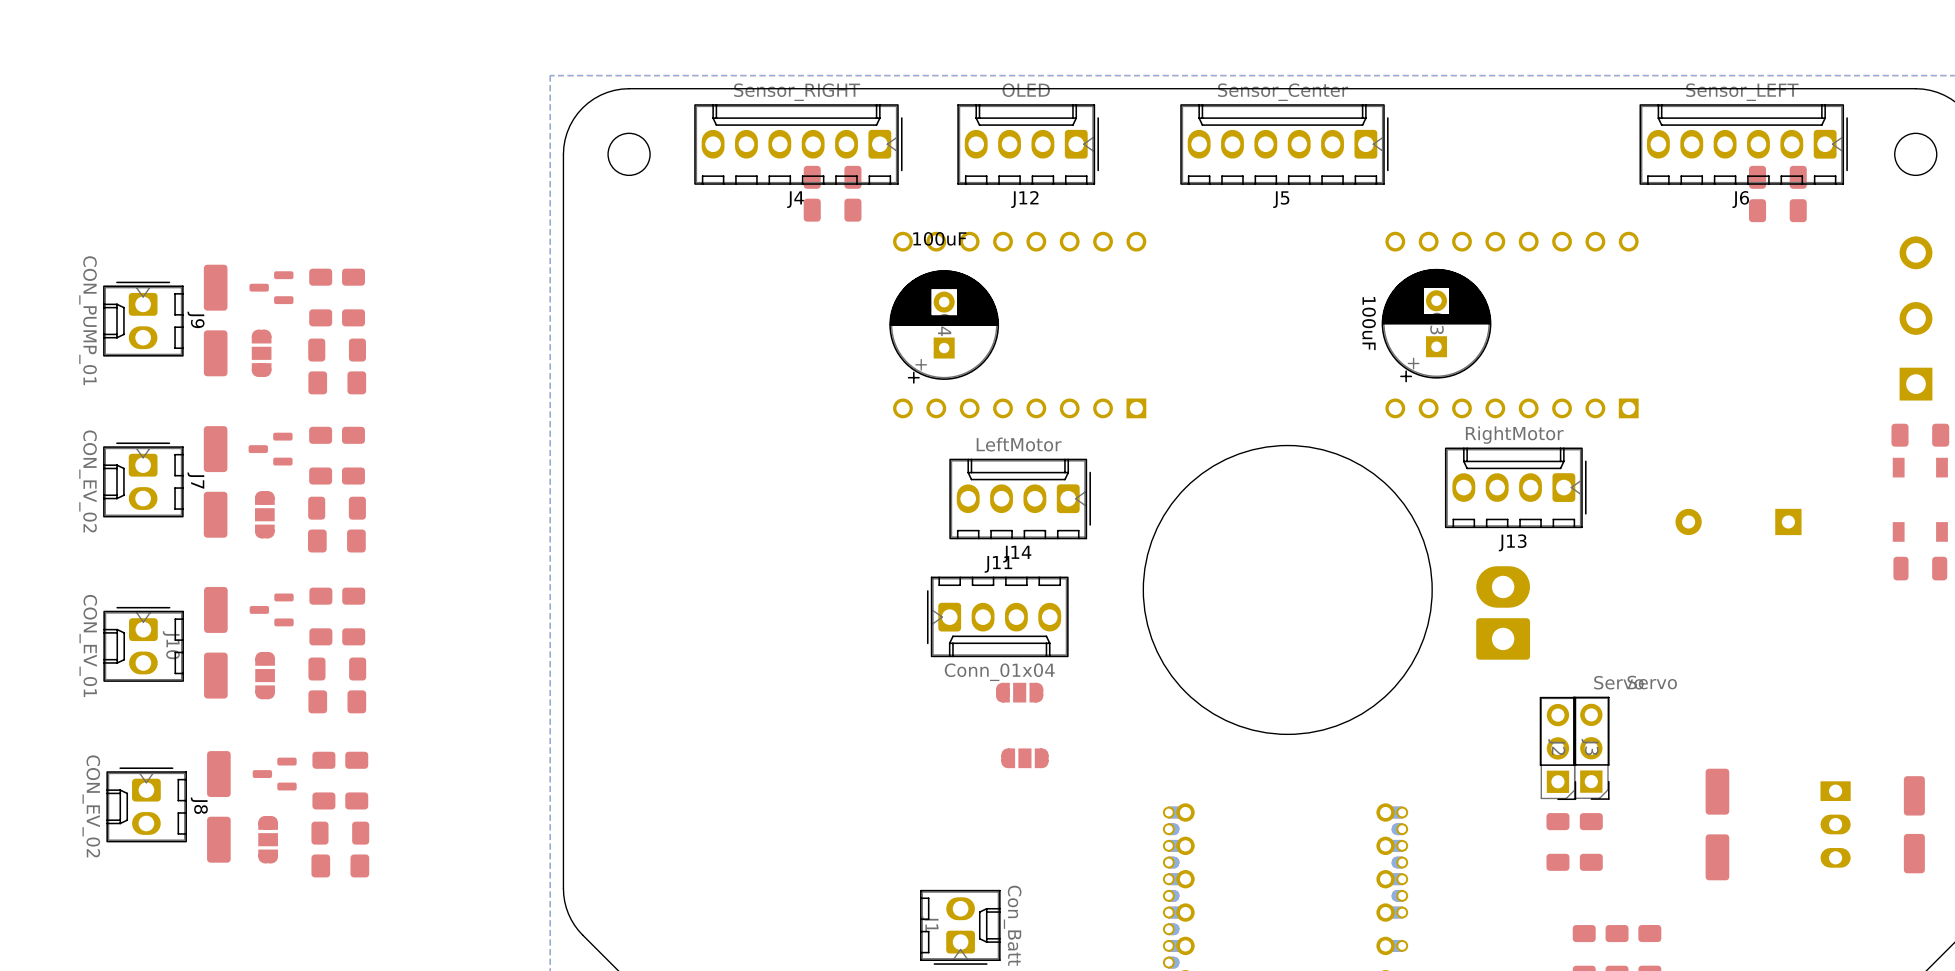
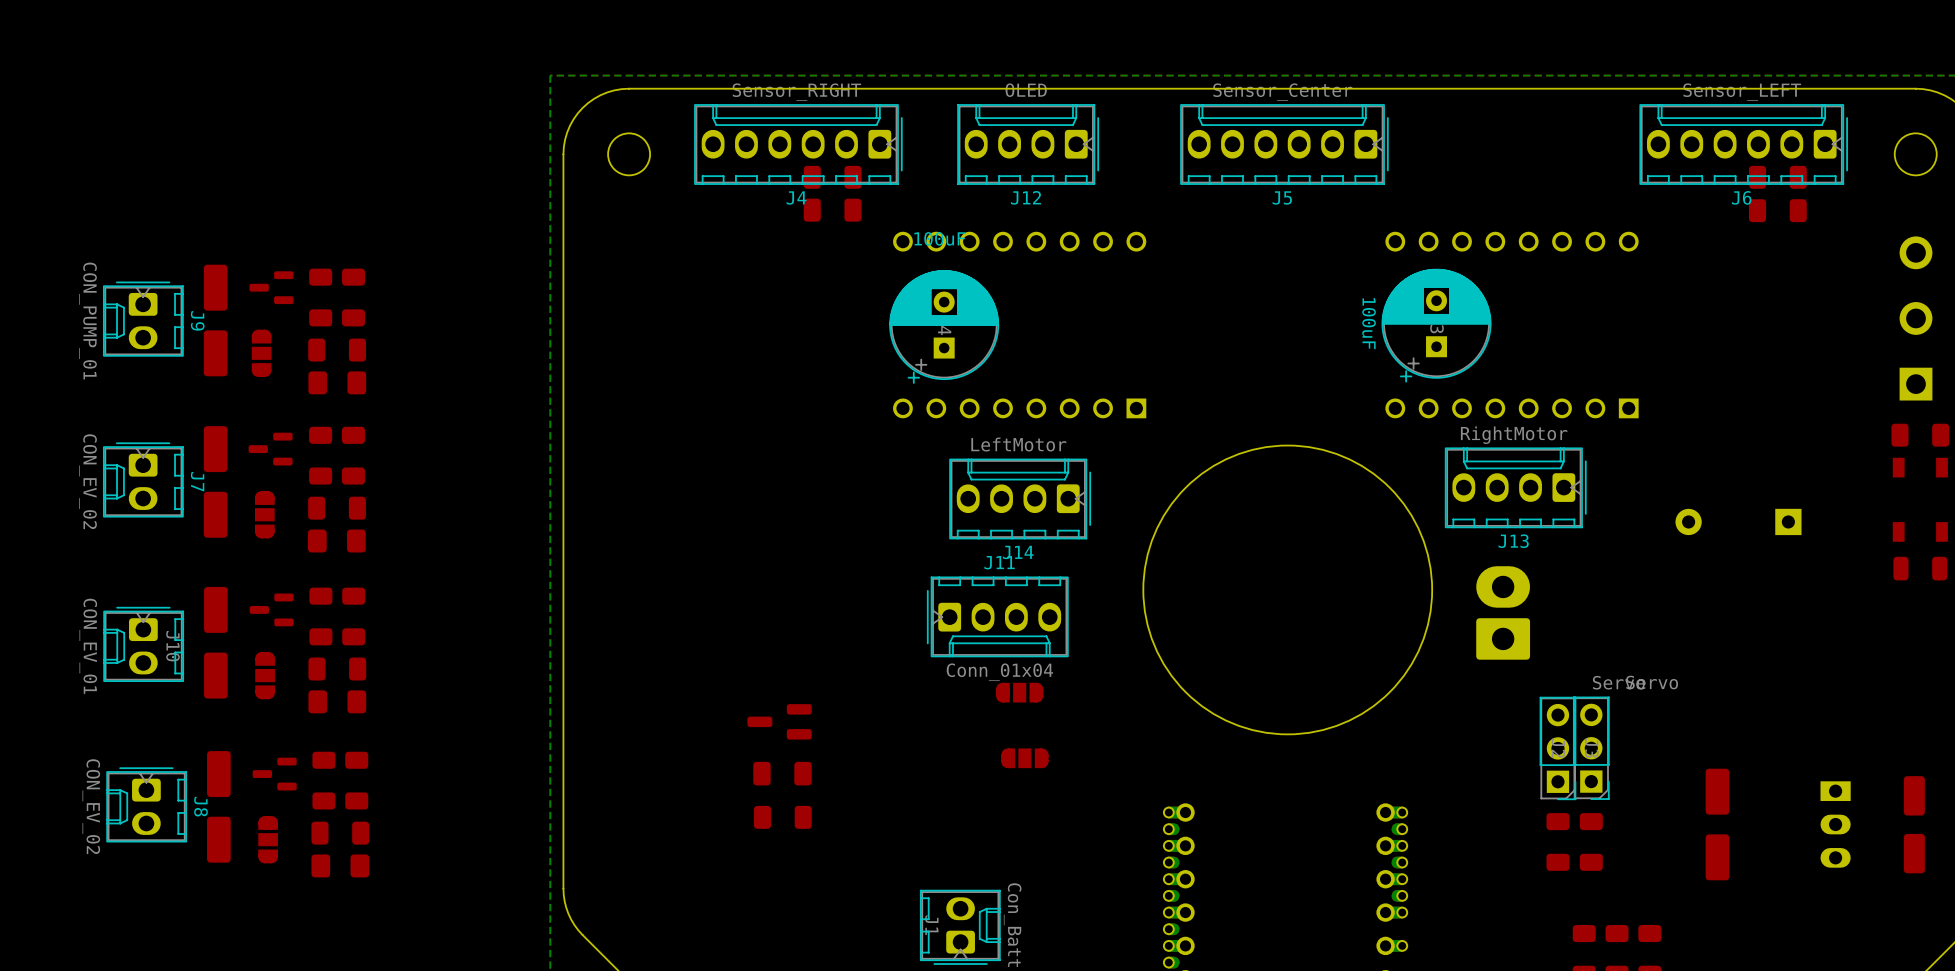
part: none -> (779, 721)
part: none -> (782, 773)
part: none -> (782, 817)

